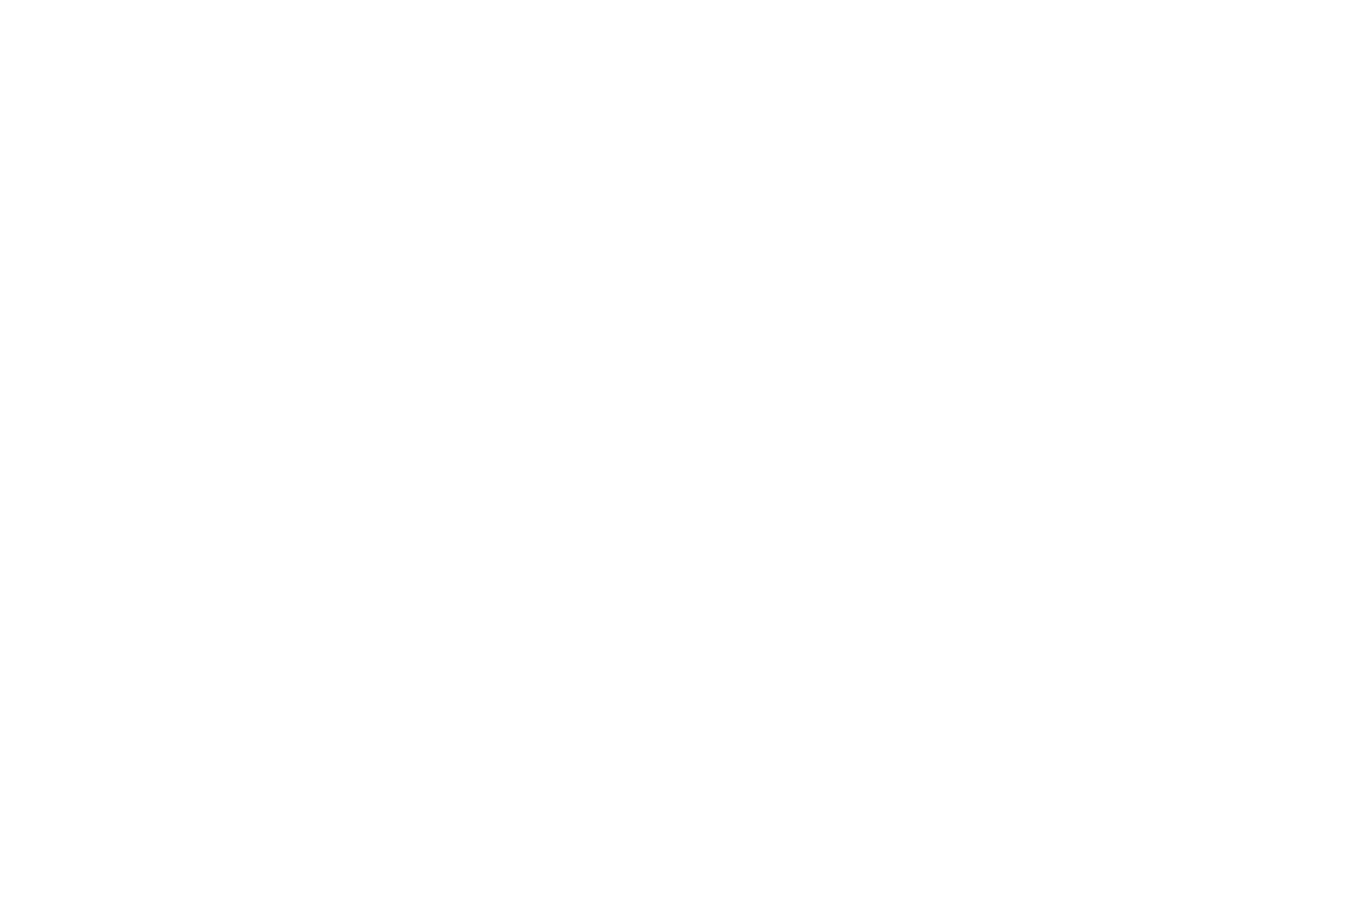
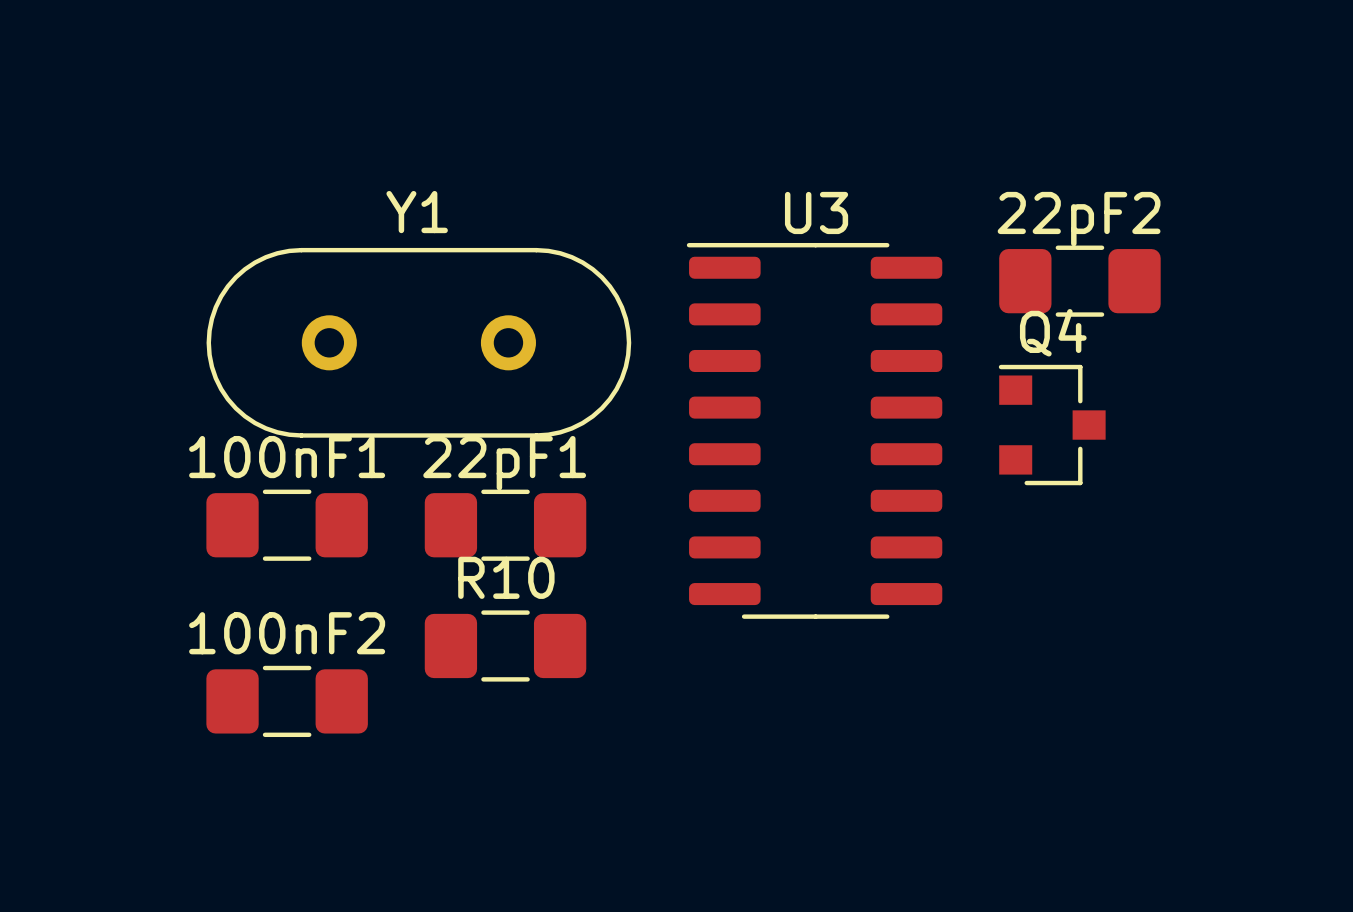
22pF2: none -> (1079, 281)
Y1: none -> (418, 342)
Q4: none -> (1052, 425)
U3: none -> (814, 430)
100nF1: none -> (287, 525)
22pF1: none -> (505, 525)
R10: none -> (505, 645)
100nF2: none -> (287, 701)

